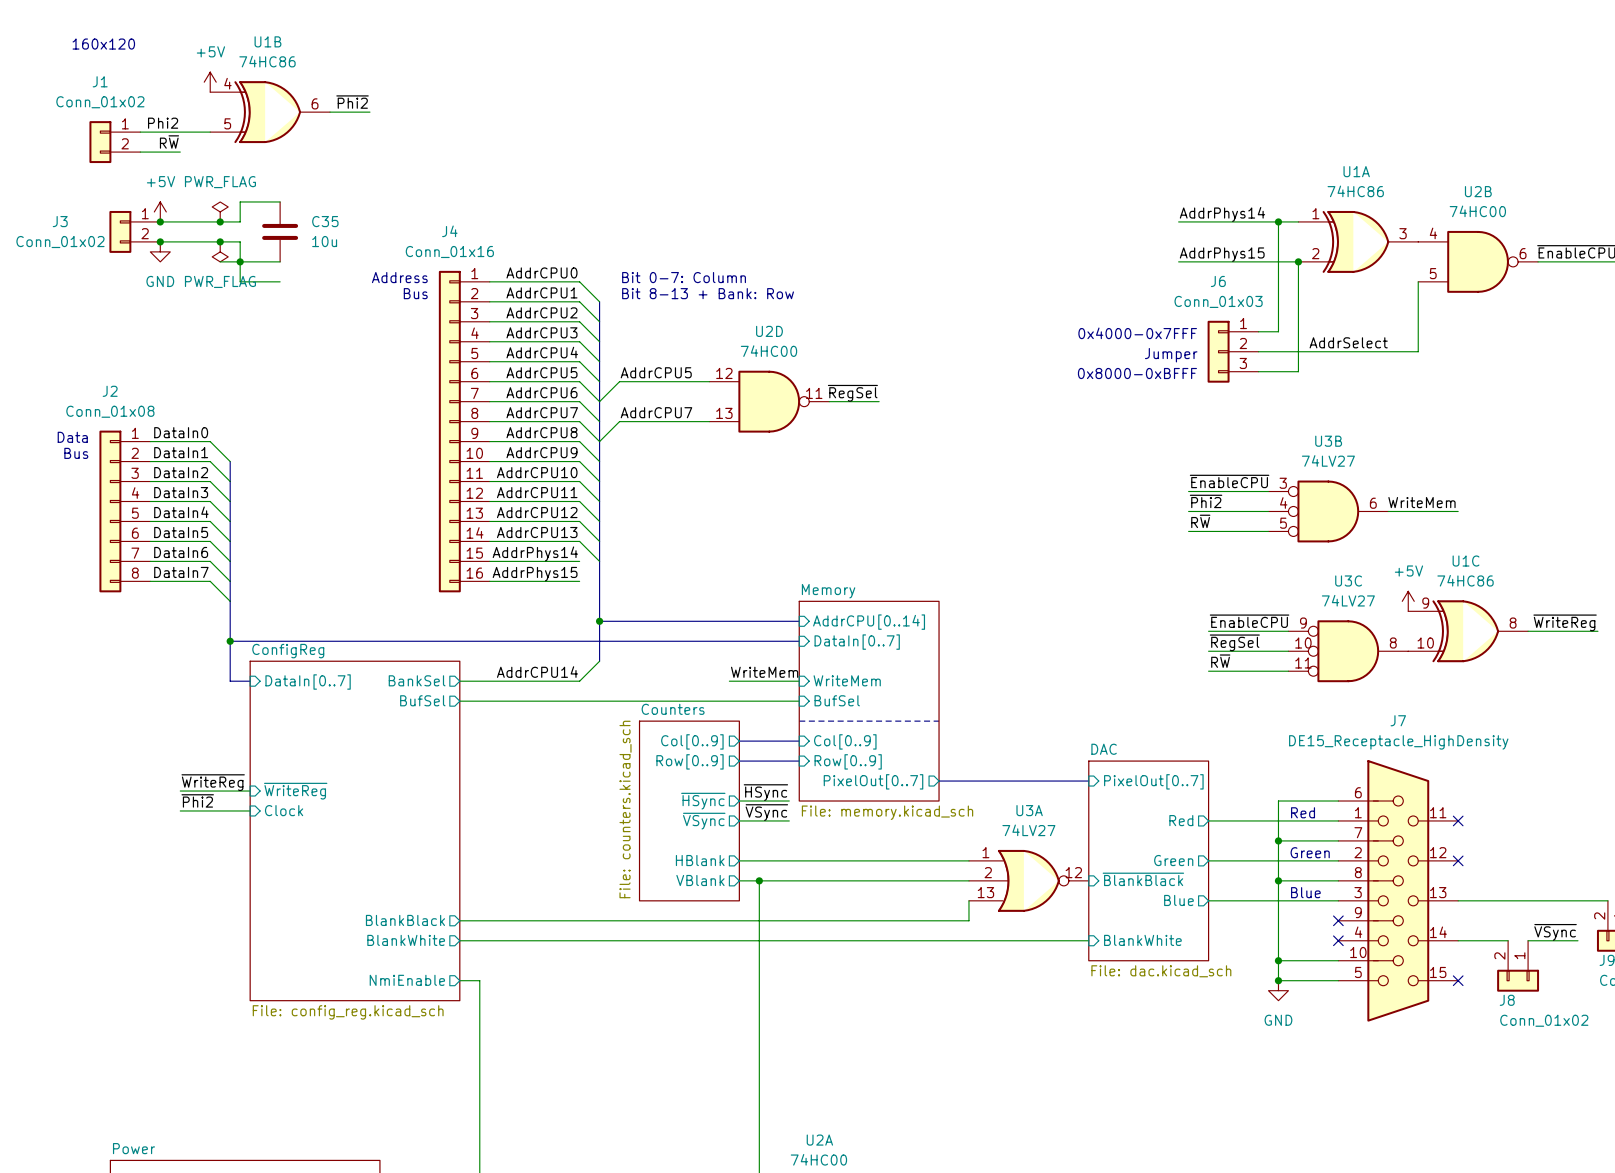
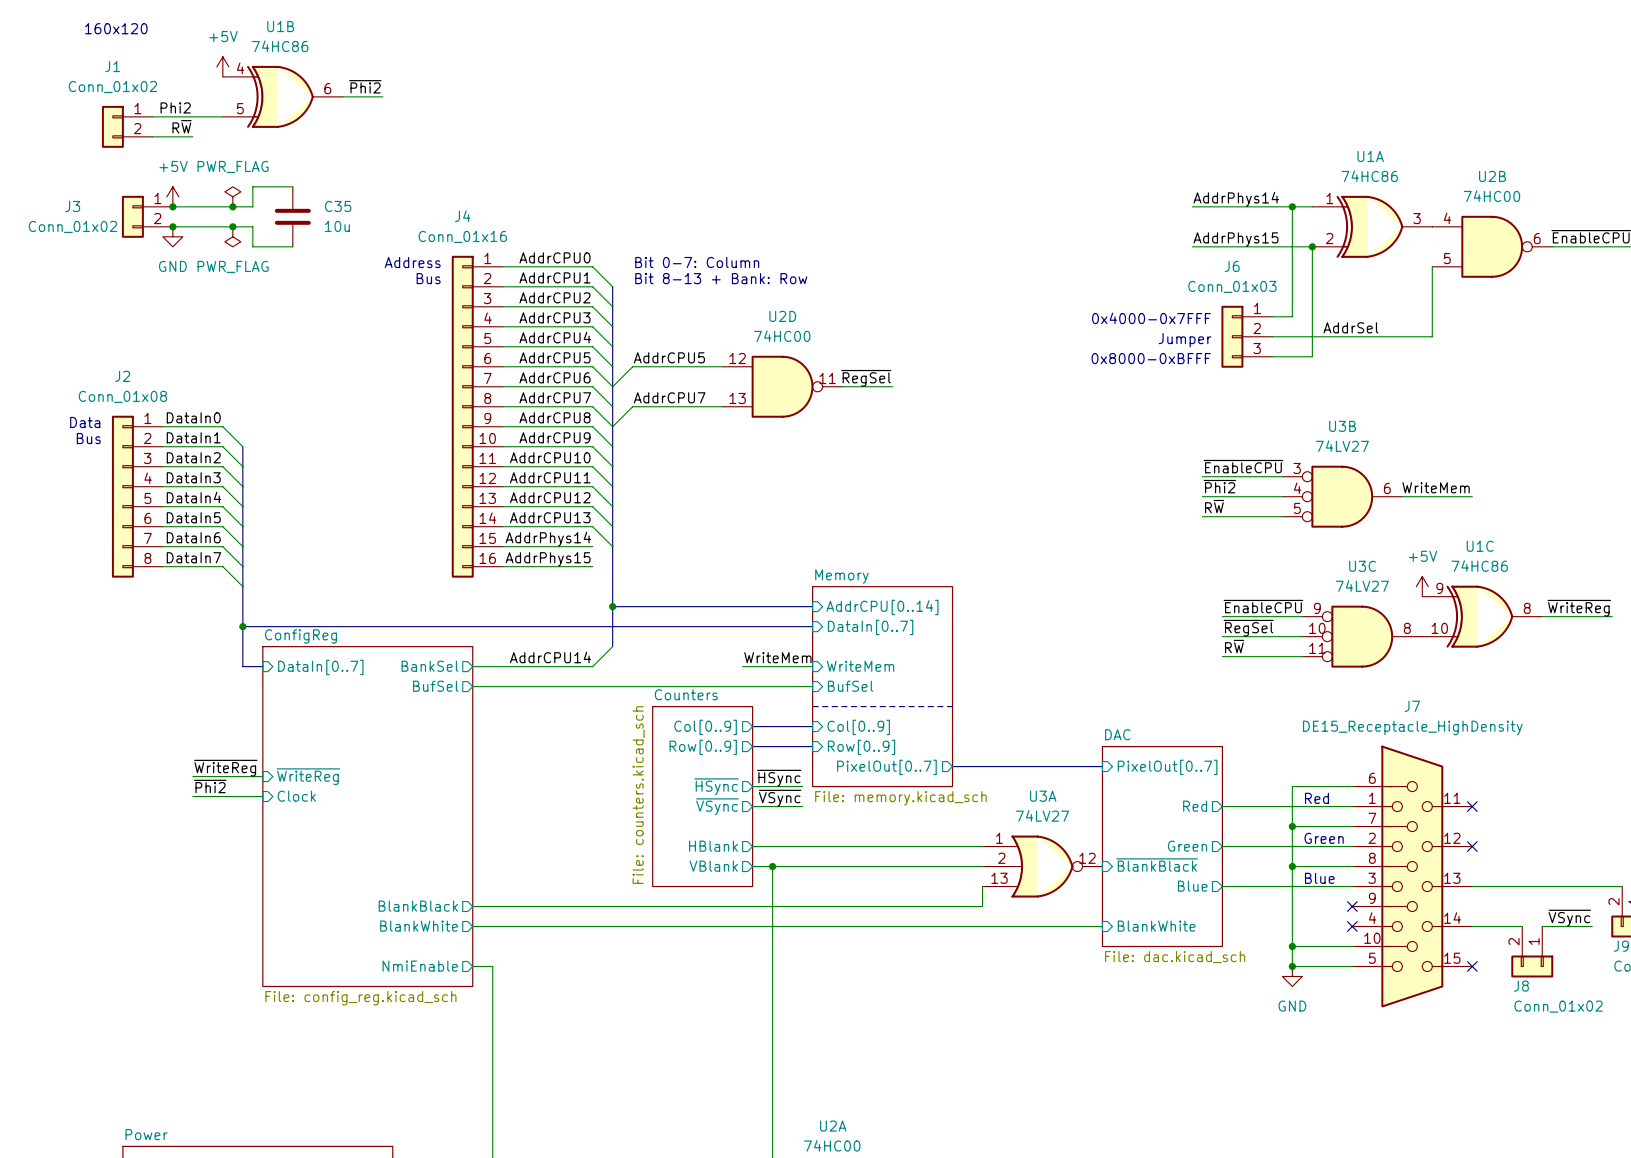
wire: (220, 261) (240, 261) (240, 281) (280, 281) -> none
junction: (240, 261) -> none
label: AddrSelect (1348, 342) -> AddrSel (1351, 327)

